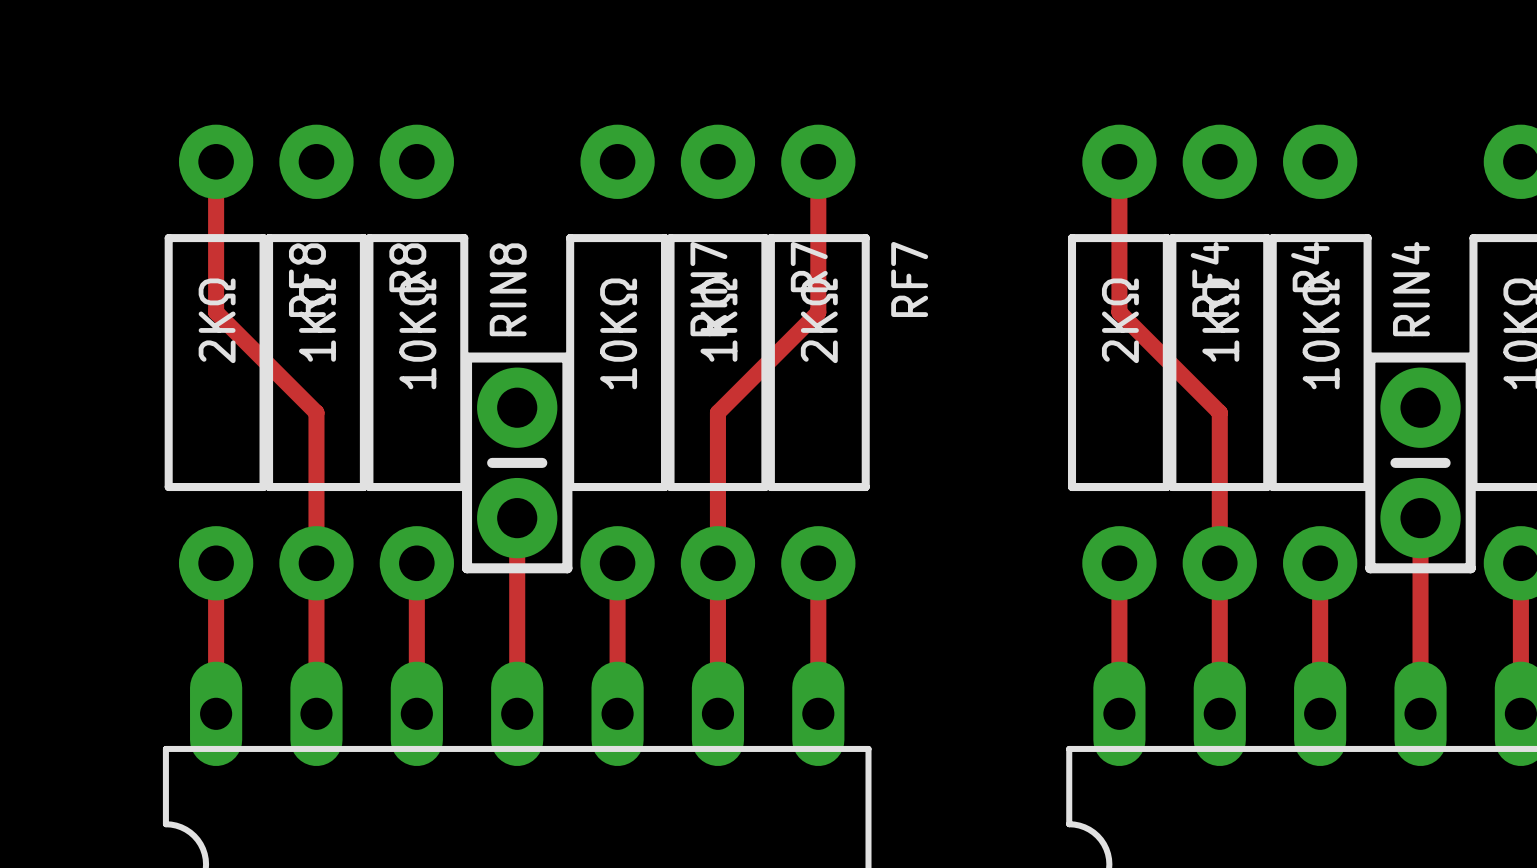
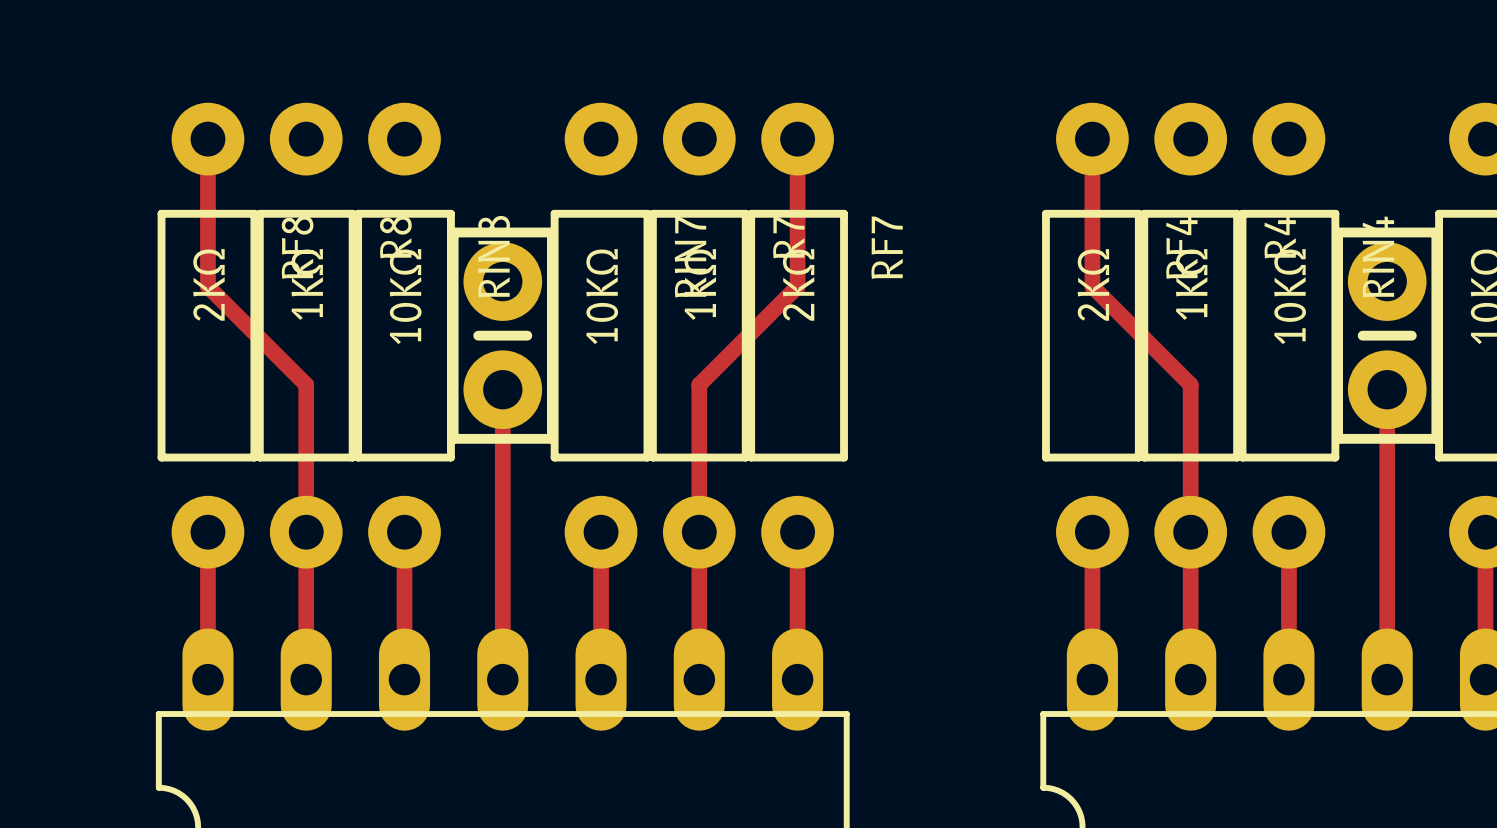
top track: none -> (502, 389) (502, 487)
top track: none -> (1387, 389) (1387, 487)
part position: (517, 462) -> (502, 335)
part position: (1420, 462) -> (1387, 335)

